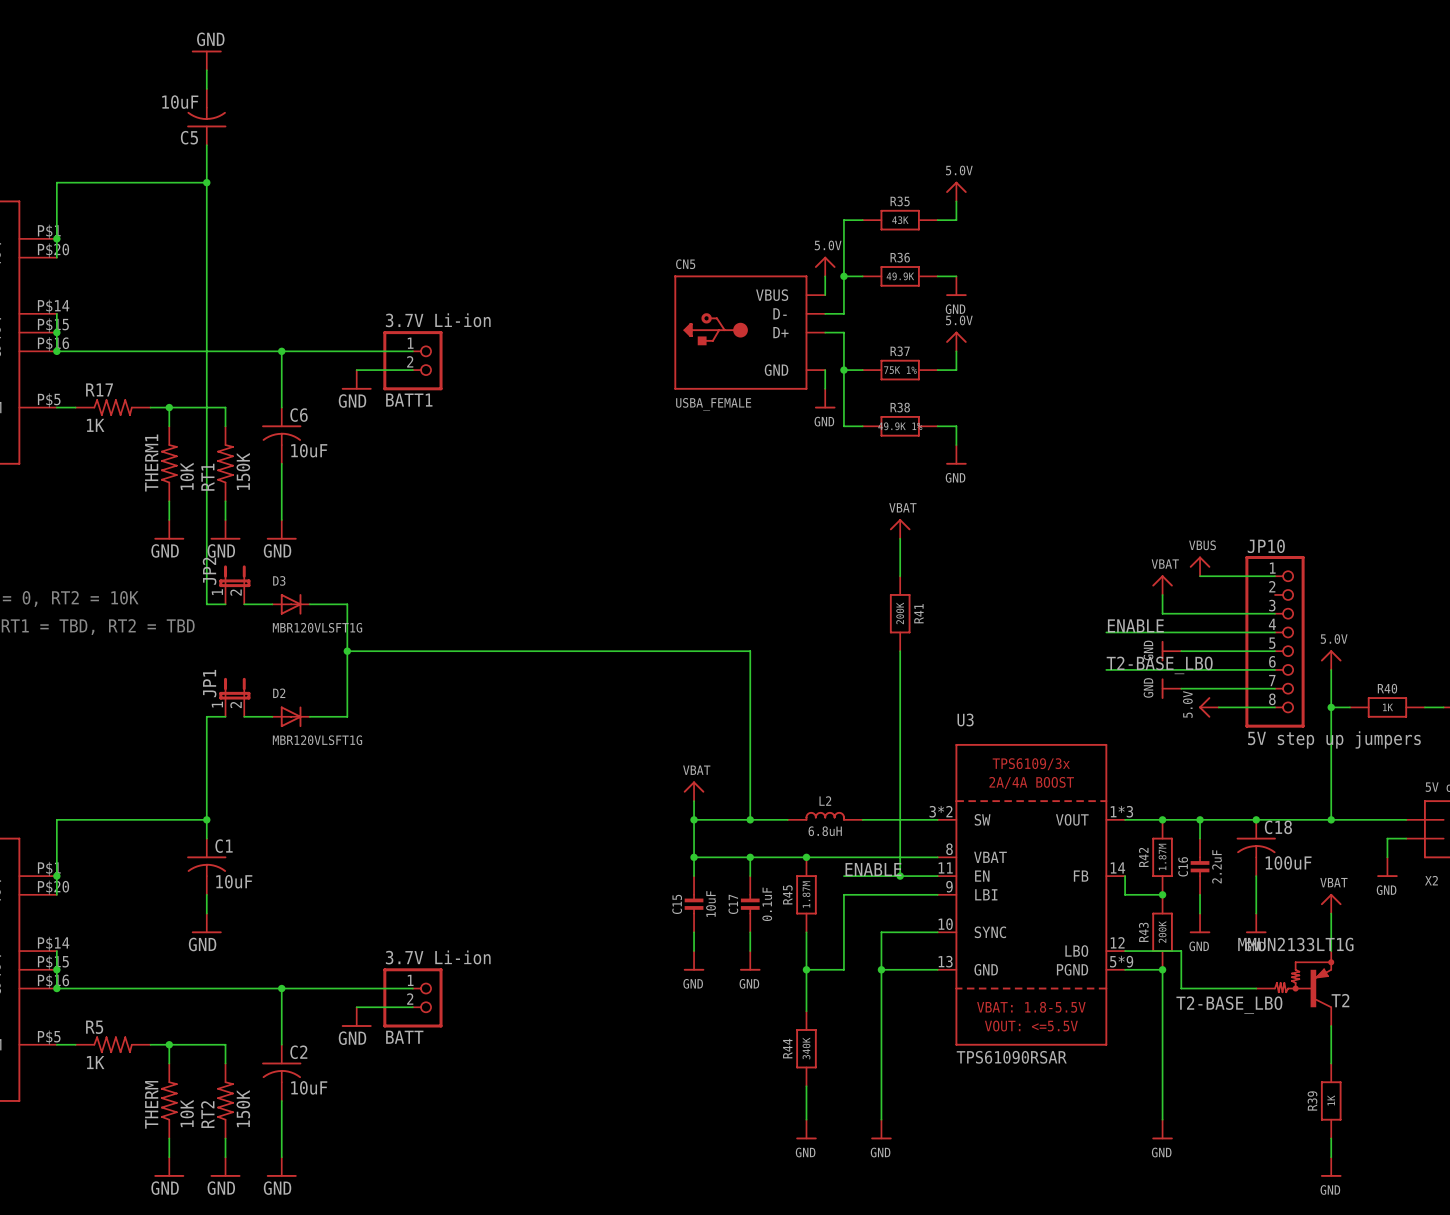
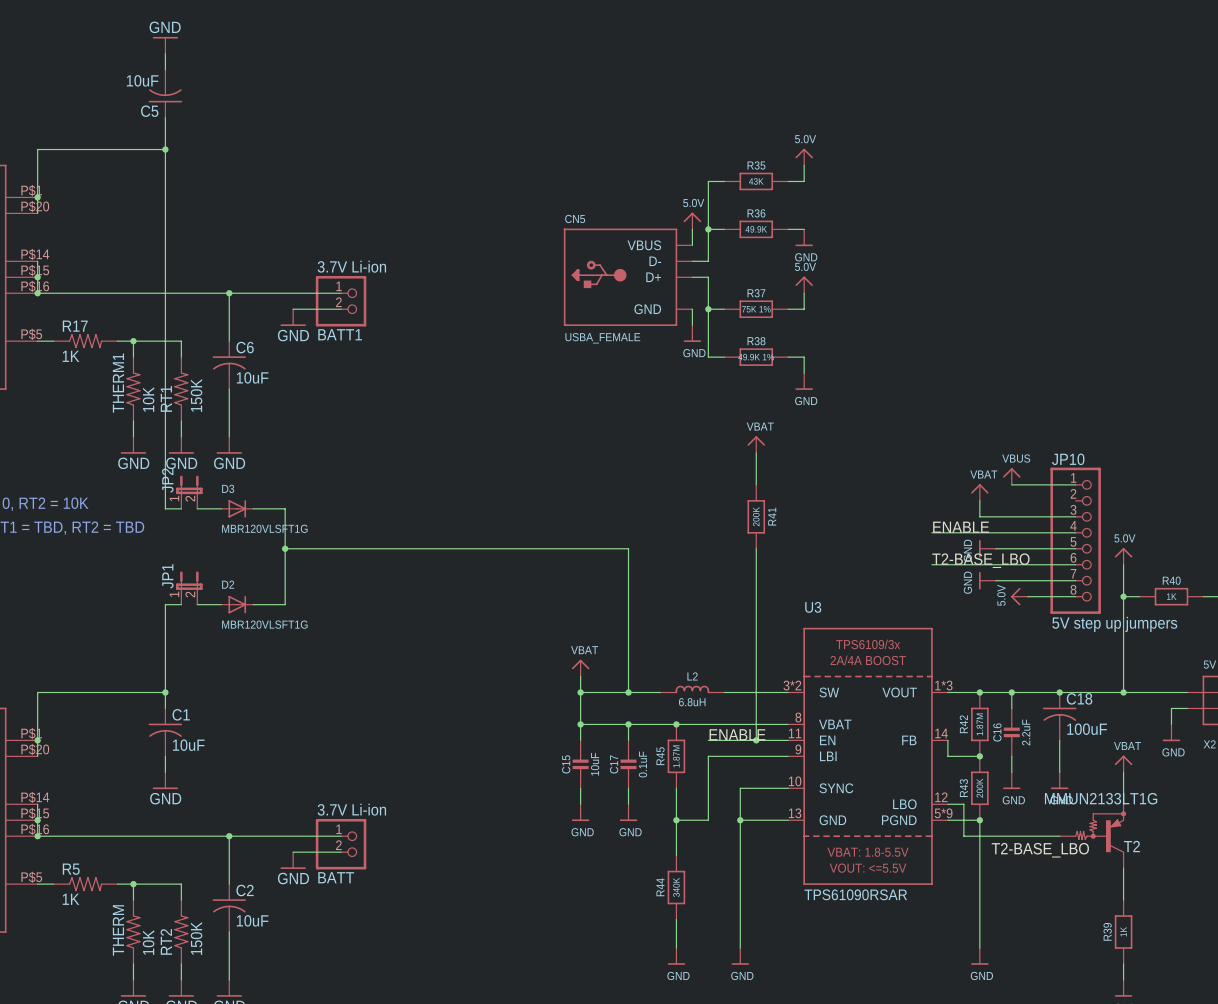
wire: (1143, 951) (1181, 951) (1181, 988) -> (963, 804) (963, 836) (995, 836)

